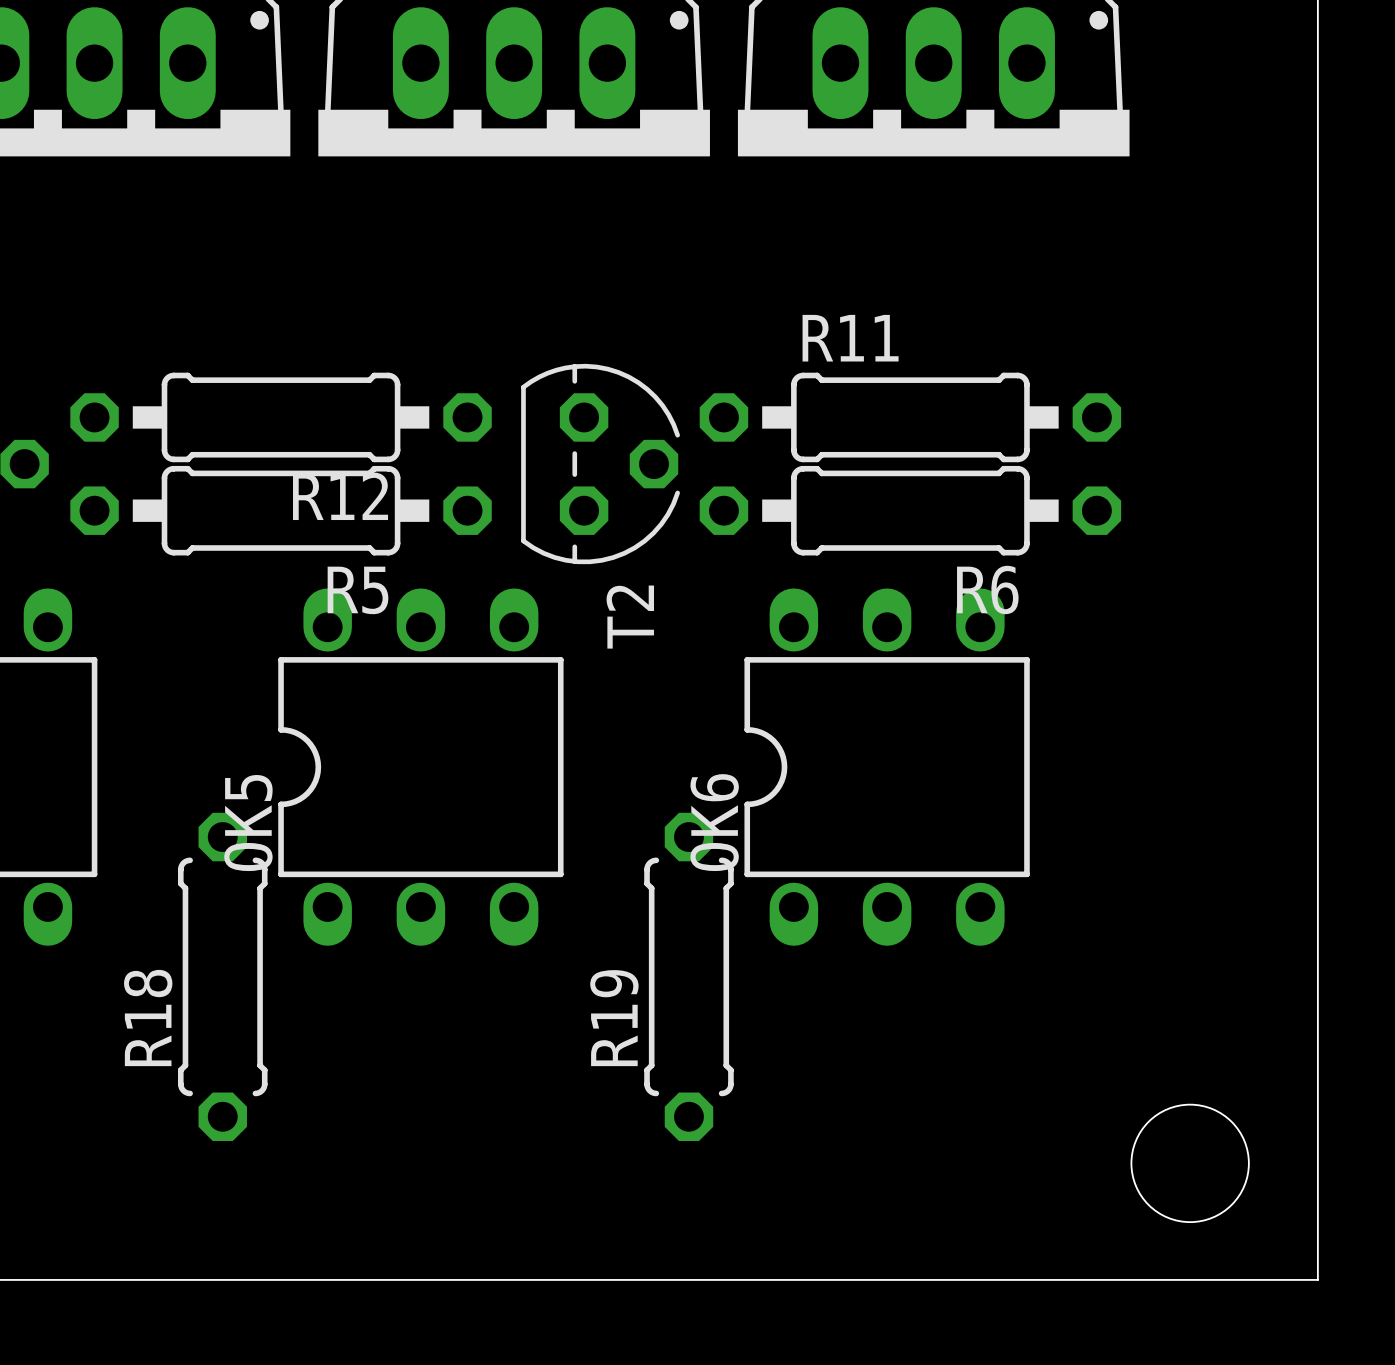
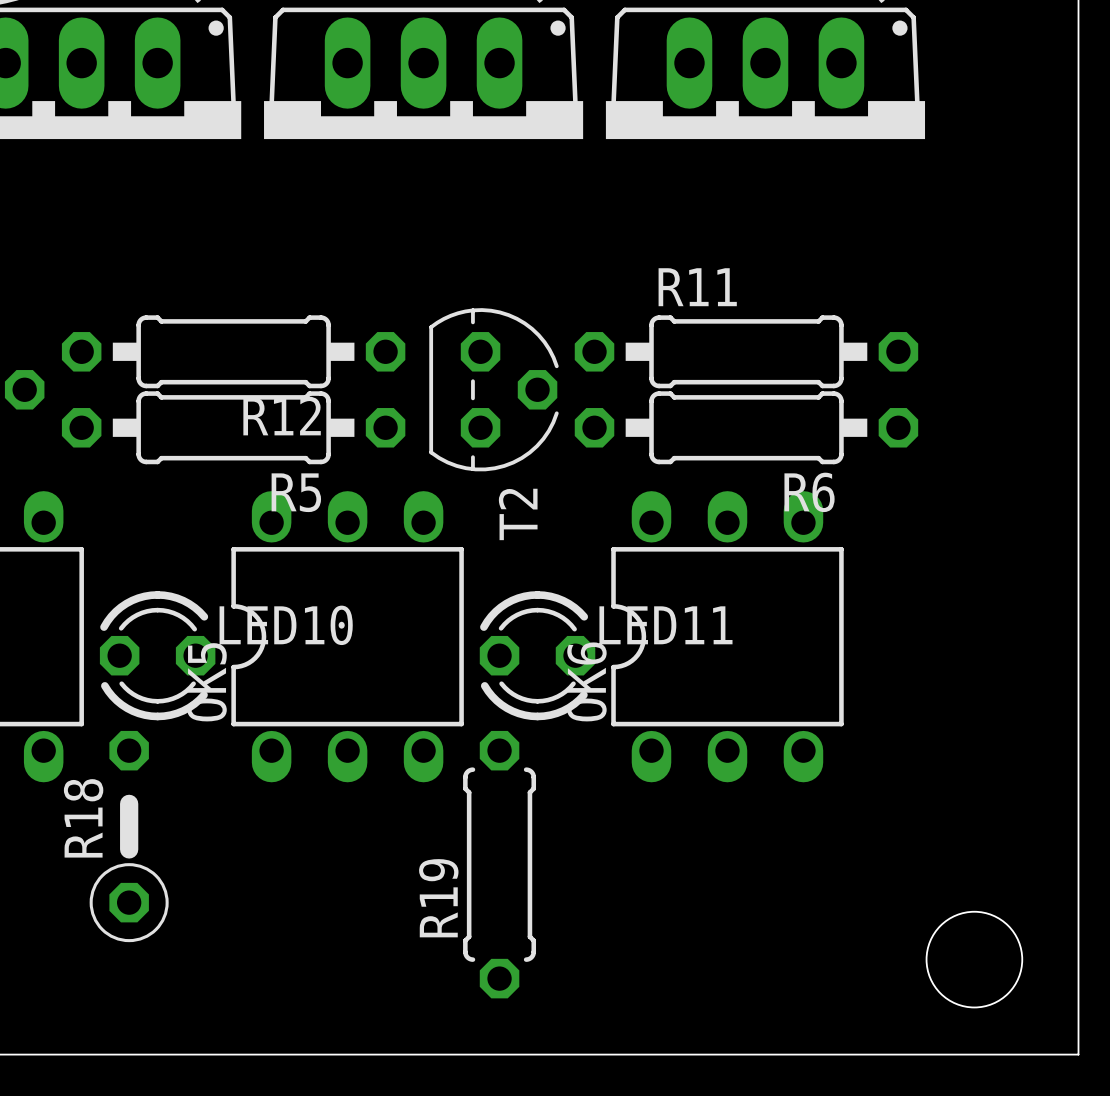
LED10: none -> (157, 655)
LED11: none -> (537, 655)
R18 footprint: [178, 812, 268, 1142] -> [89, 730, 169, 943]
R19 position: (688, 976) -> (499, 864)

